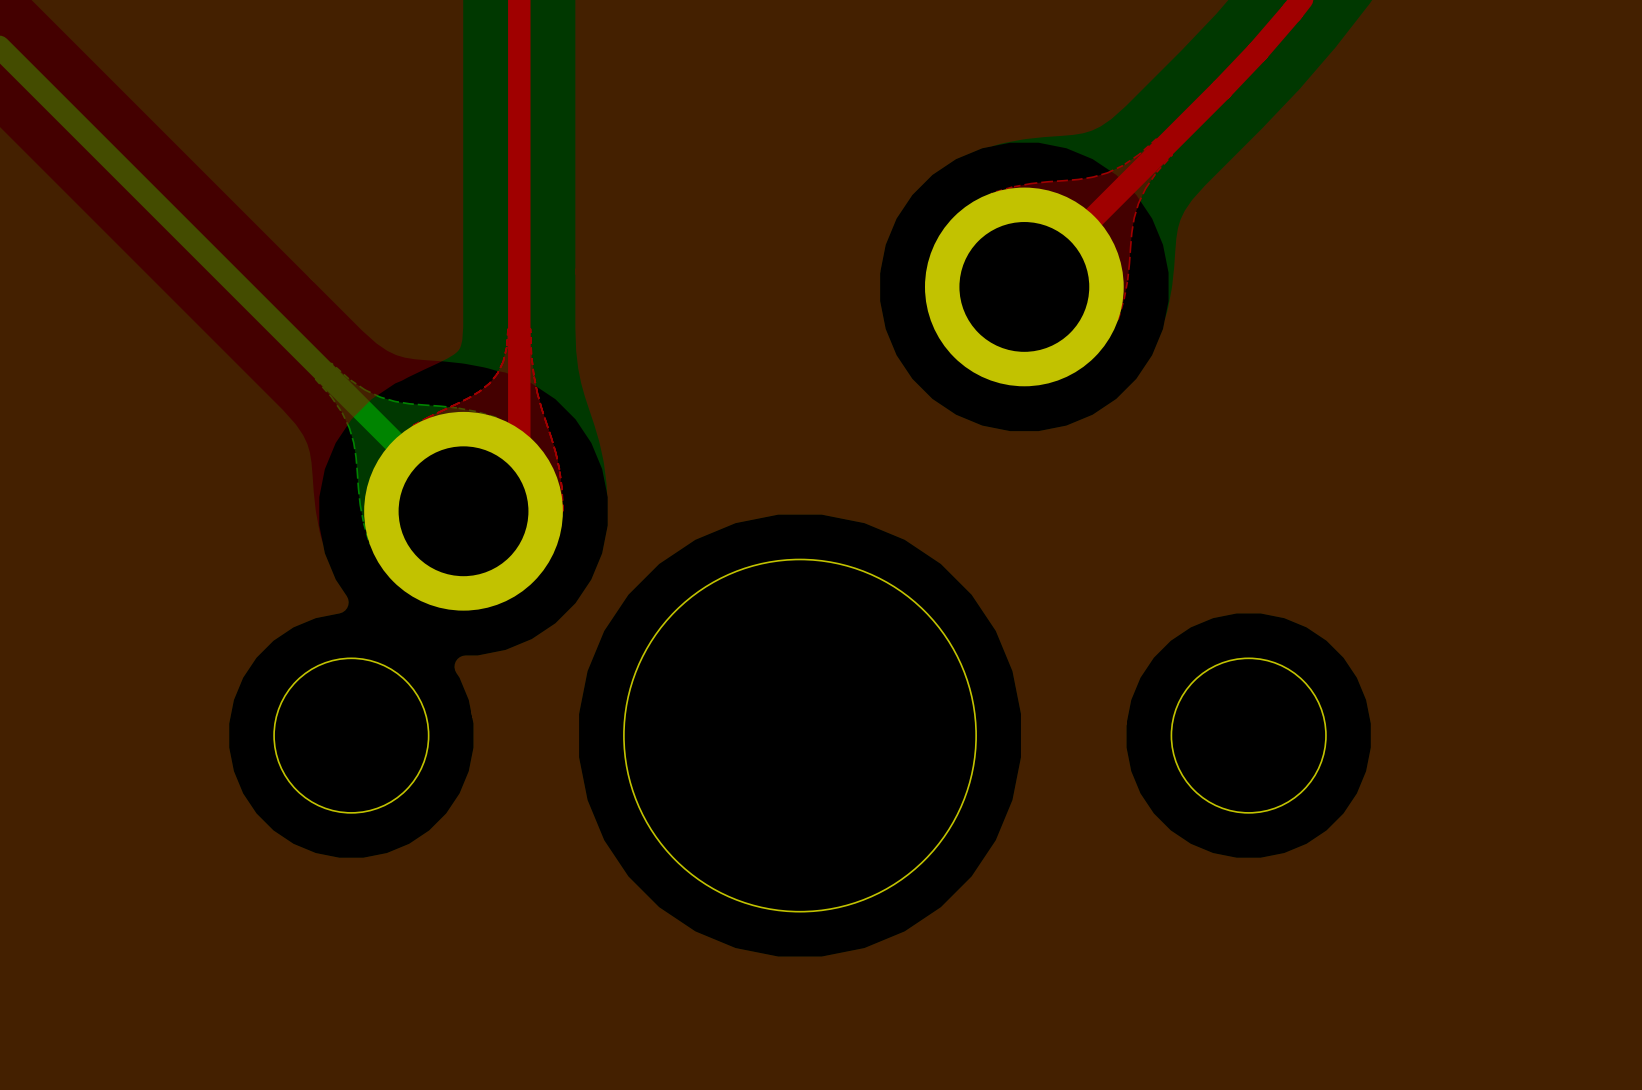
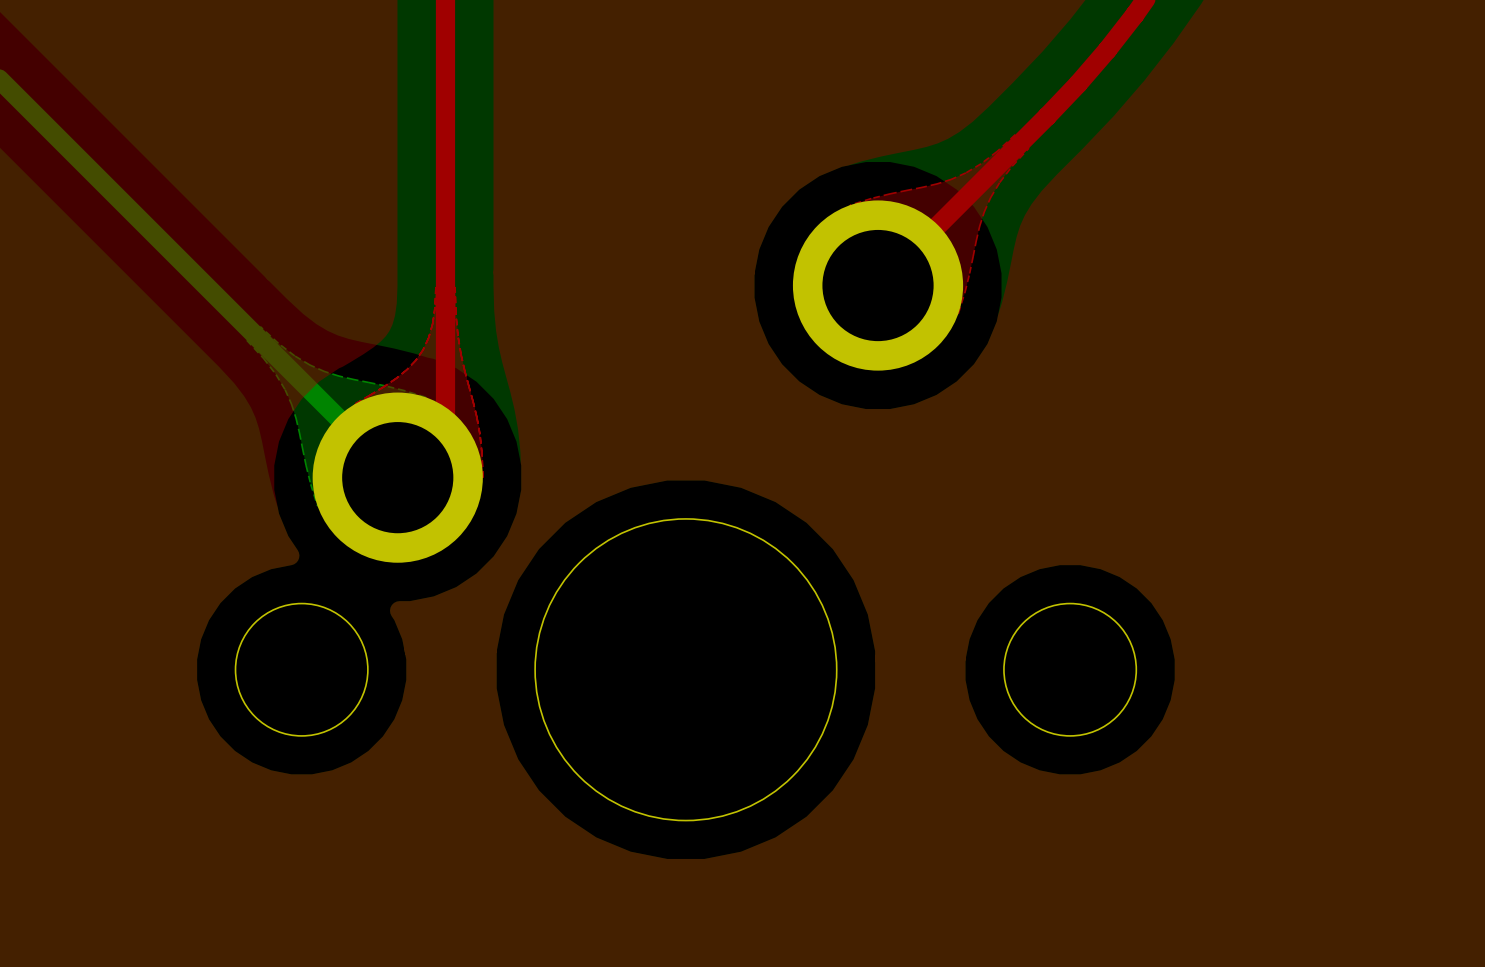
top zone outline: (991, 193) (1030, 183) (1078, 179) (1107, 172) (1139, 154) (1156, 138) (1172, 154) (1156, 172) (1138, 203) (1131, 232) (1127, 280) (1118, 319) -> (850, 205) (951, 179) (981, 163) (1015, 134) (1028, 148) (999, 182) (984, 212) (958, 313)
bottom zone outline: (496, 417) (456, 407) (409, 403) (380, 397) (348, 378) (331, 363) (315, 378) (331, 396) (349, 427) (356, 457) (360, 504) (369, 543) -> (425, 397) (324, 371) (294, 355) (260, 326) (246, 340) (276, 374) (291, 404) (317, 505)
top zone outline: (413, 425) (469, 397) (489, 383) (503, 361) (508, 328) (530, 328) (533, 375) (559, 469) (562, 511) -> (354, 404) (396, 378) (415, 360) (428, 337) (432, 323) (435, 287) (455, 287) (457, 335) (479, 434) (482, 477)

